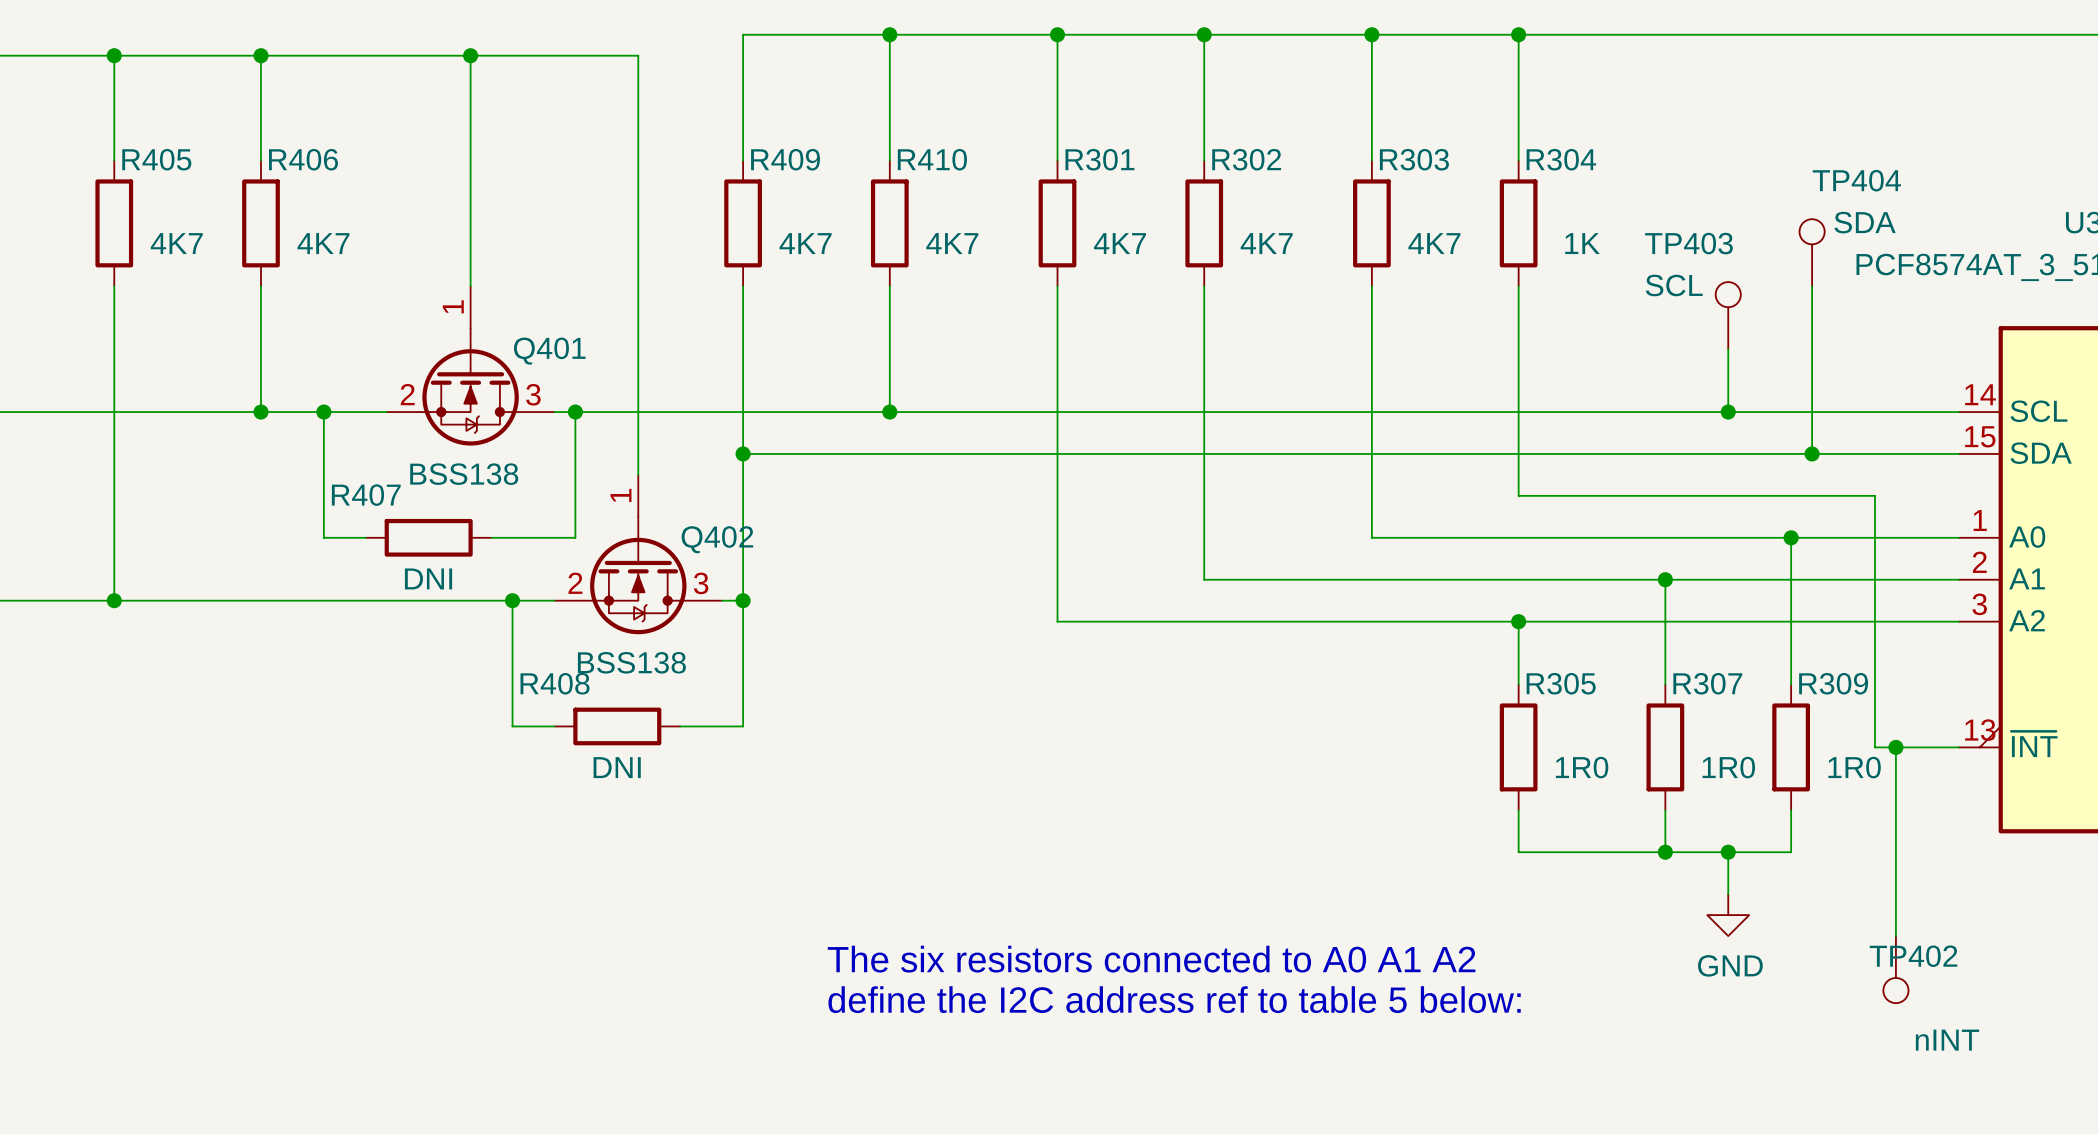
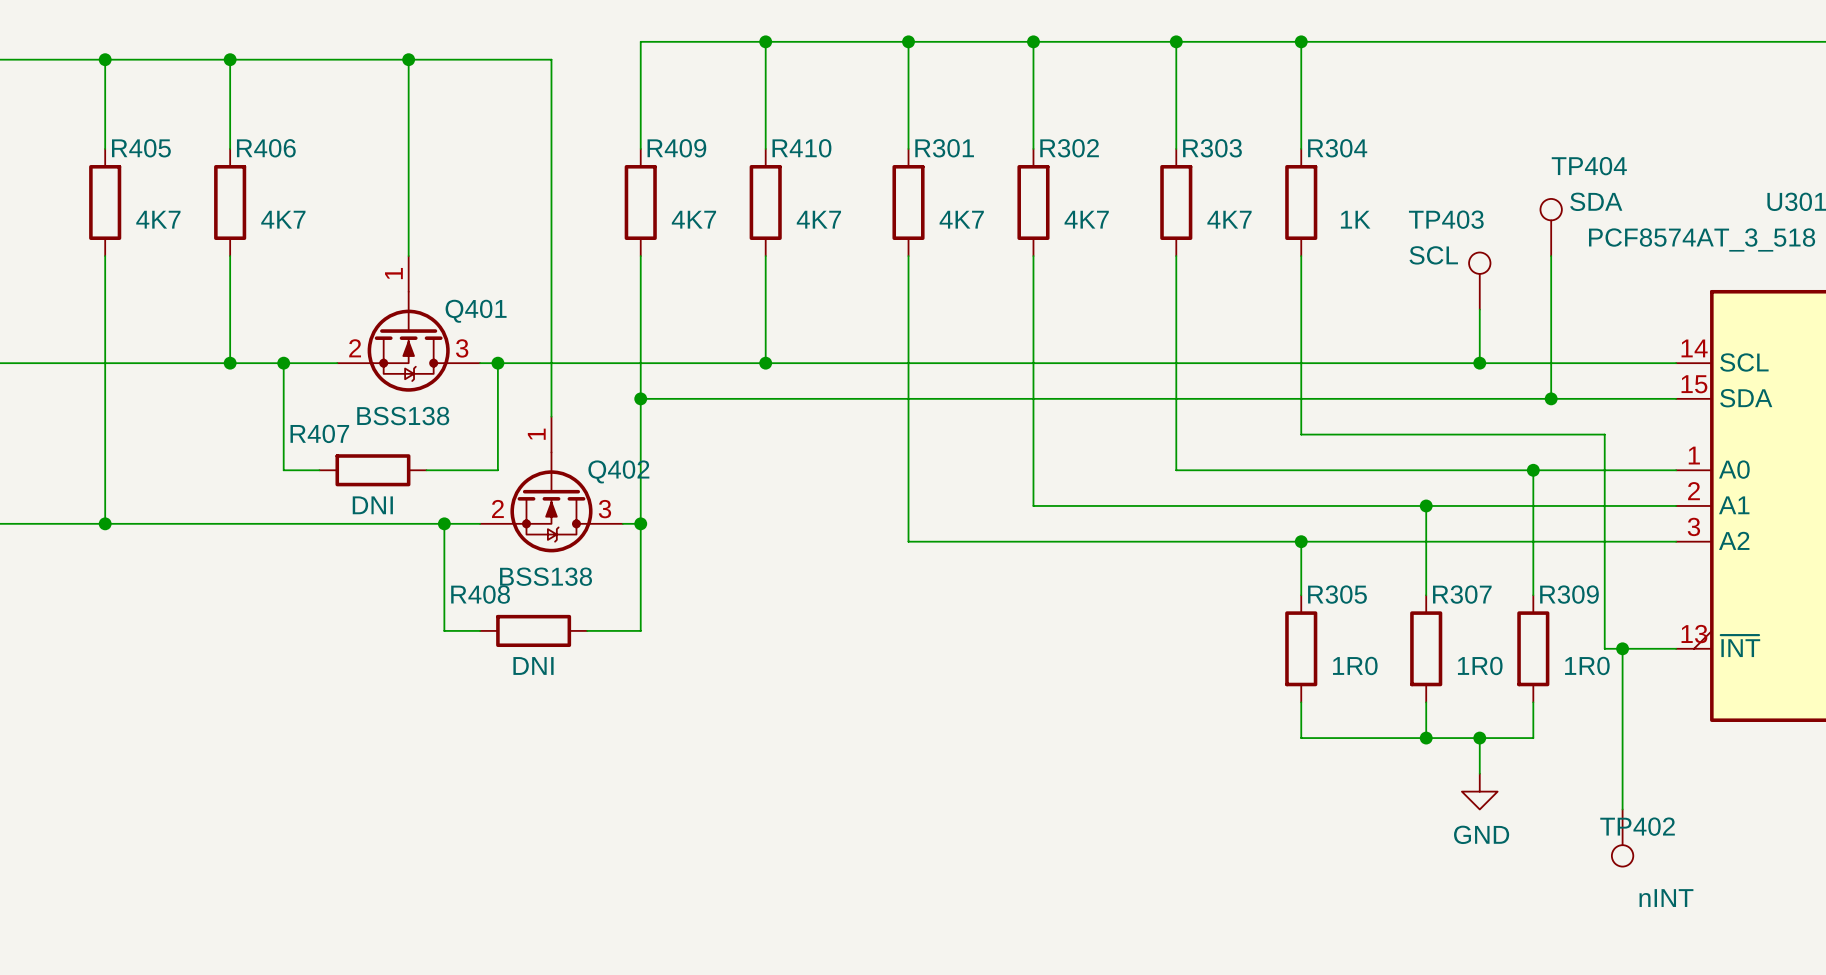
text: The six resistors connected to A0 A1 A2 (1151, 959) -> none
text: define the I2C address ref to table 5 below: (1174, 999) -> none

